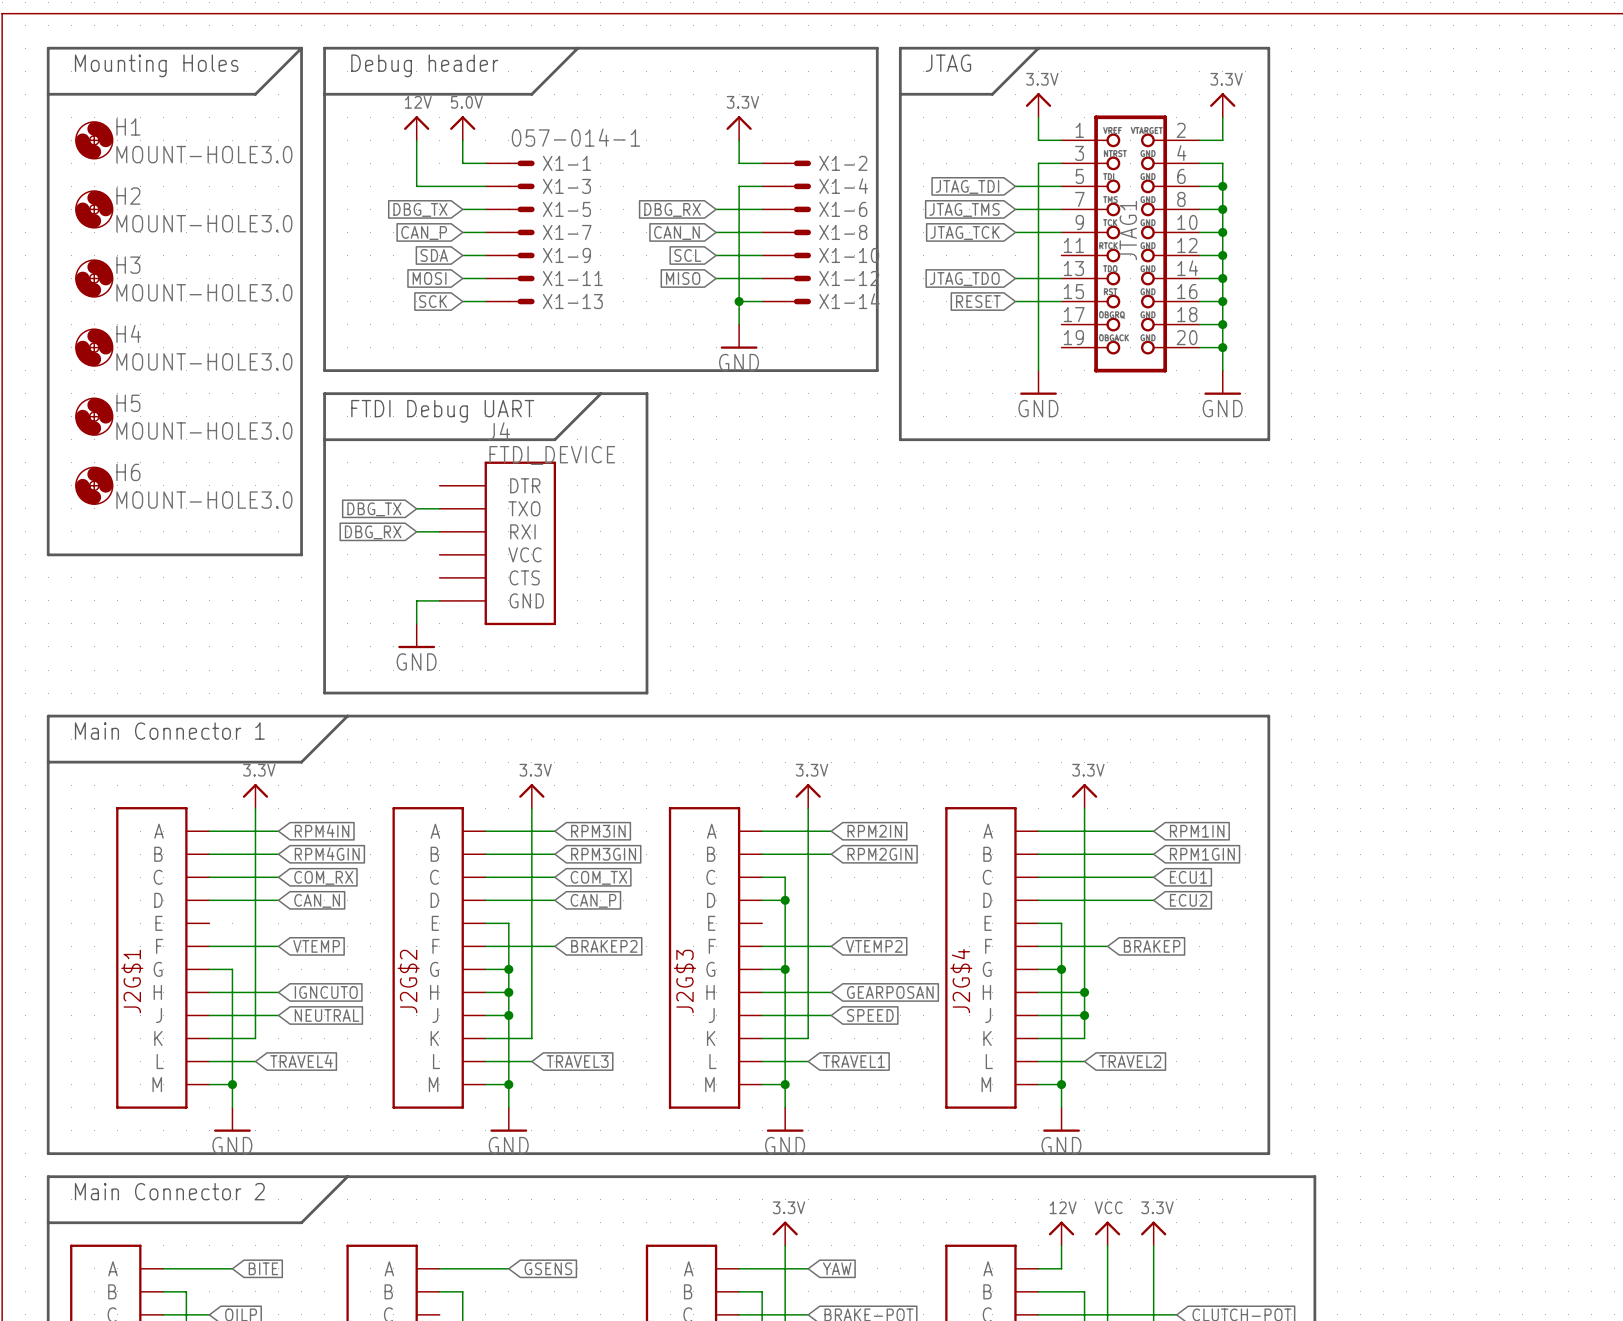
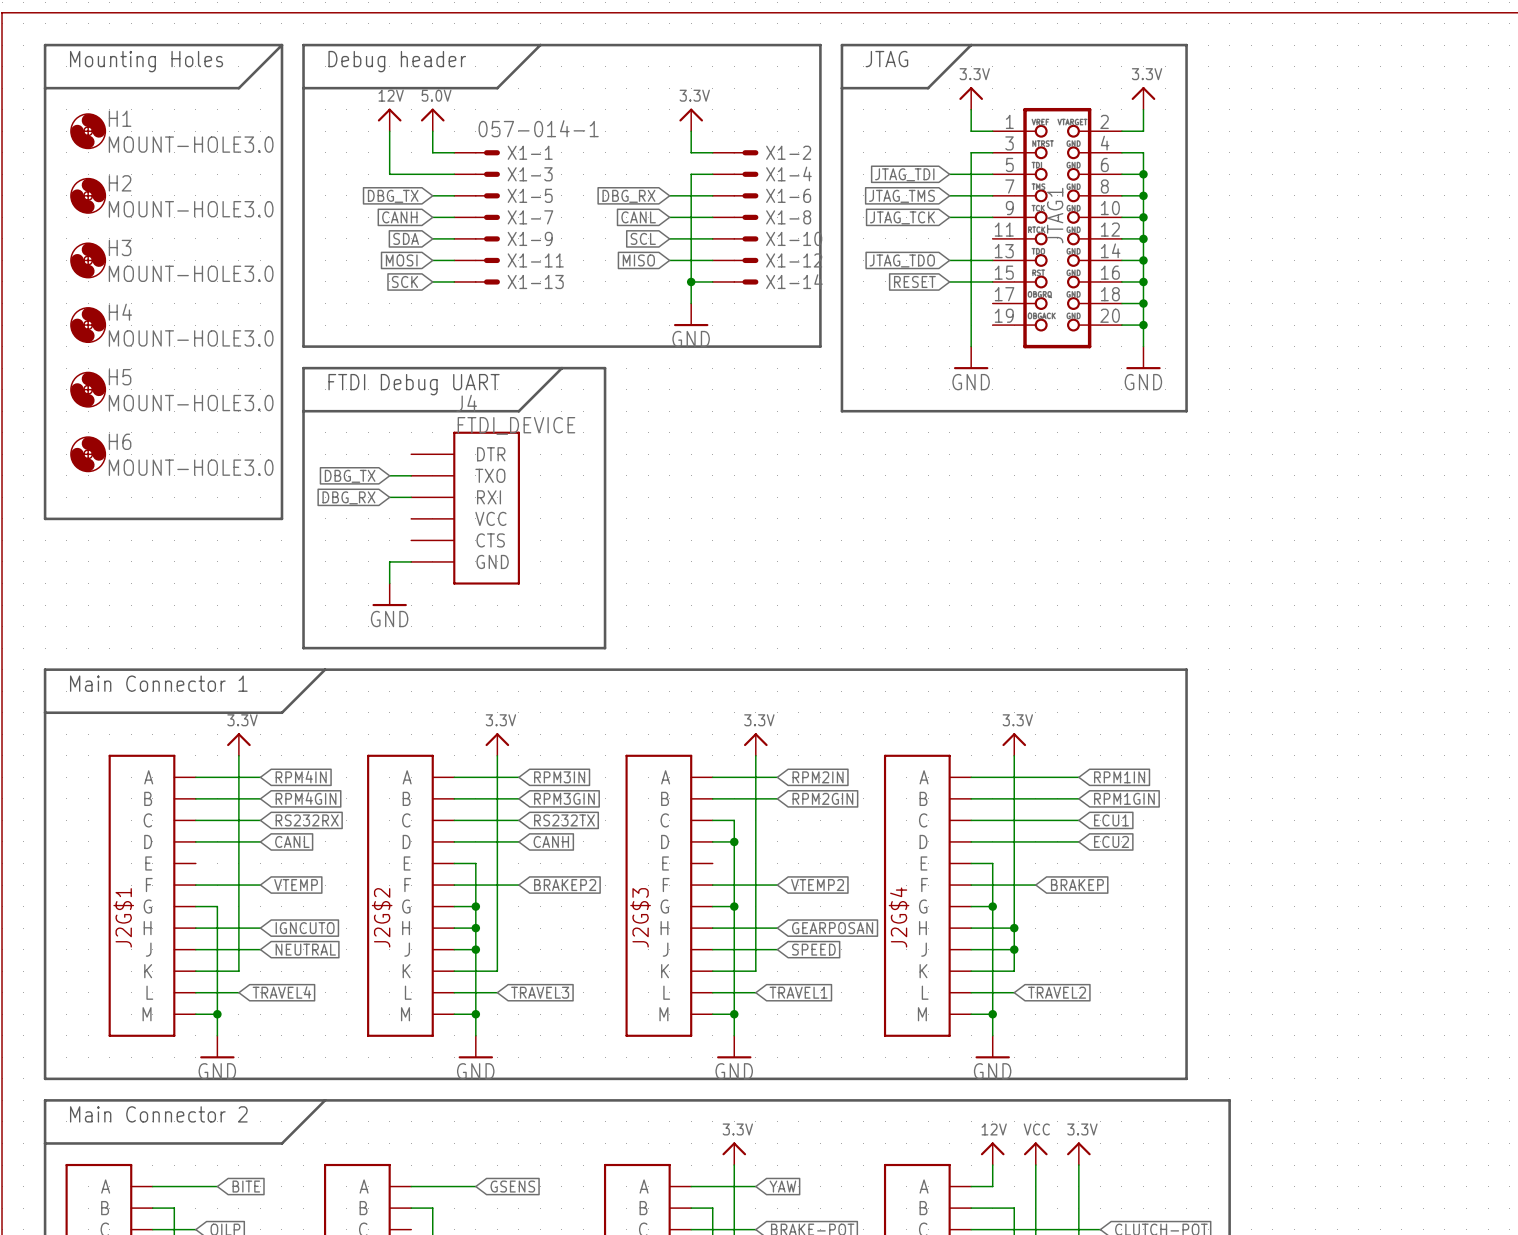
global label: CAN_P (424, 232) -> CANH (399, 217)
global label: CAN_N (676, 232) -> CANL (638, 217)
global label: COM_RX (323, 877) -> RS232RX (307, 820)
global label: COM_TX (598, 877) -> RS232TX (564, 820)
global label: CAN_N (317, 900) -> CANL (292, 841)
global label: CAN_P (593, 900) -> CANH (551, 841)

